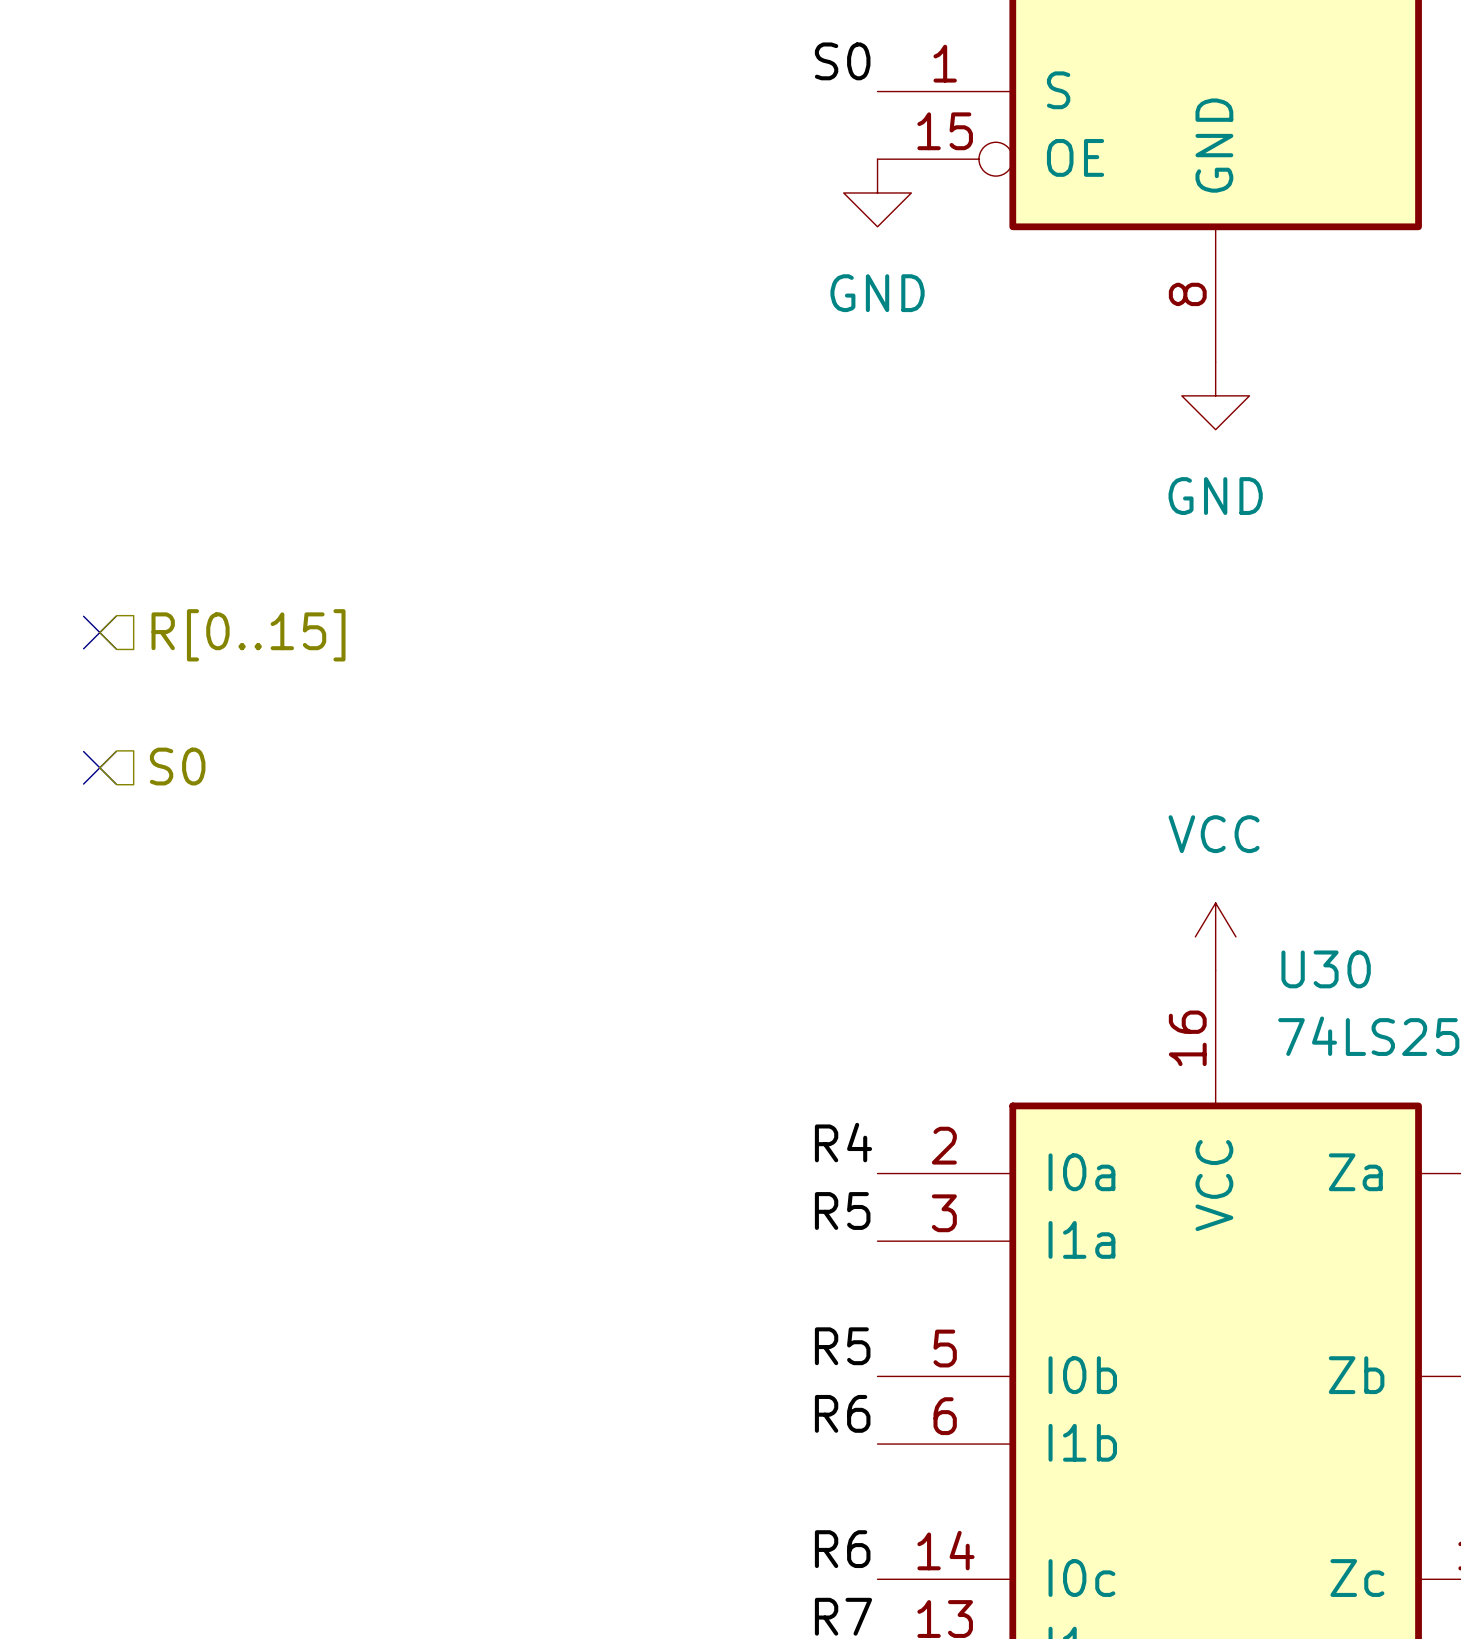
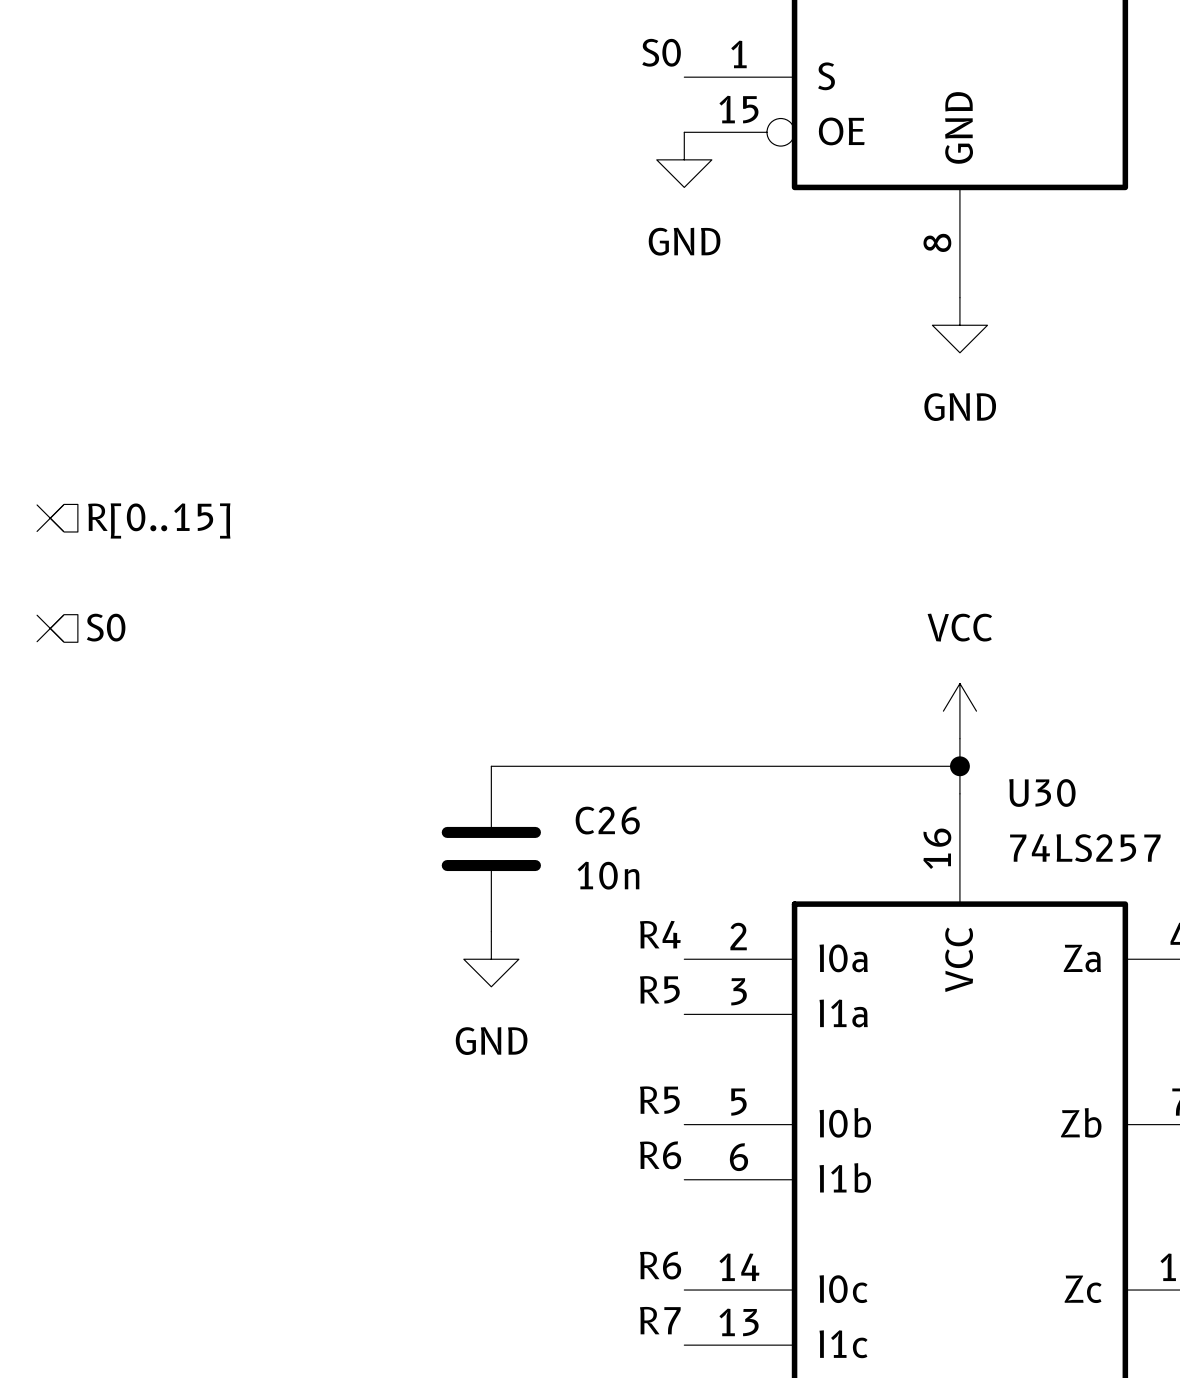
wire: none -> (491, 766) (959, 766)
power symbol position: VCC (1215, 936) -> VCC (959, 711)
junction: none -> (959, 766)
C26: none -> 10n (491, 848)
power symbol: none -> GND (491, 959)

